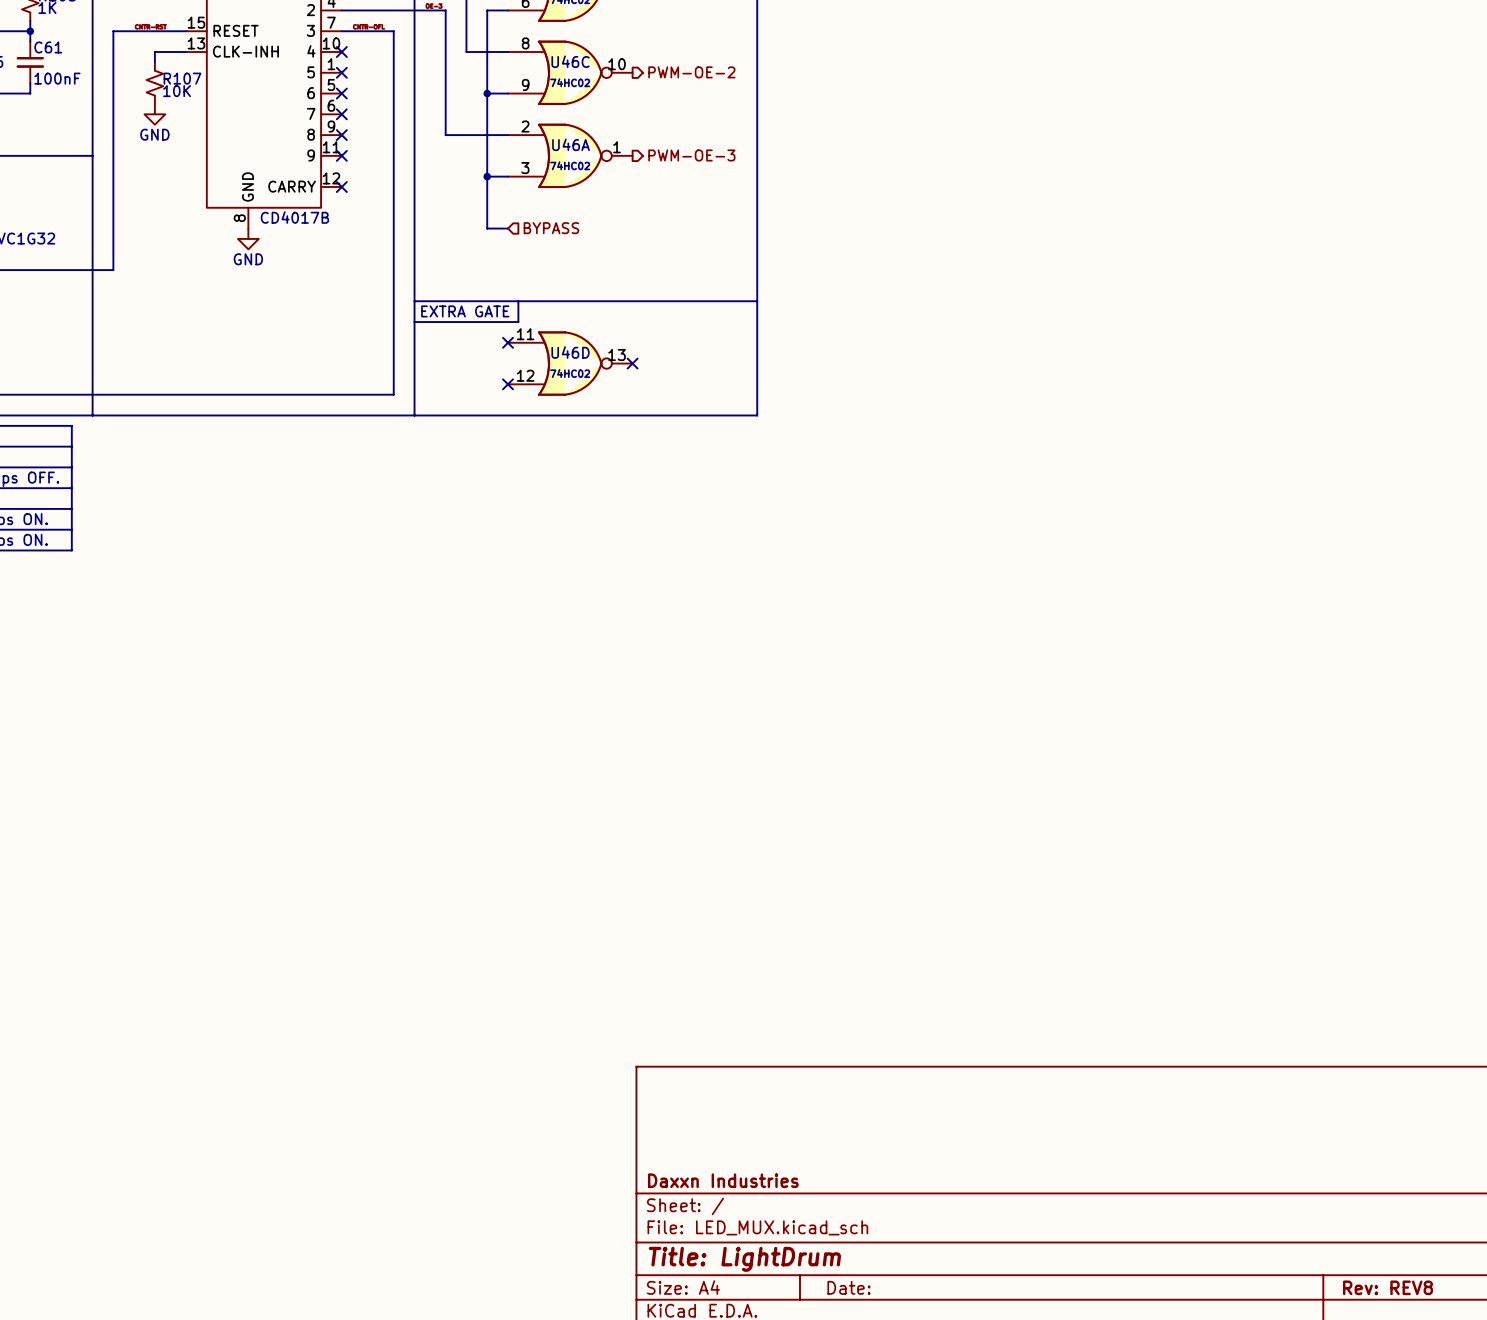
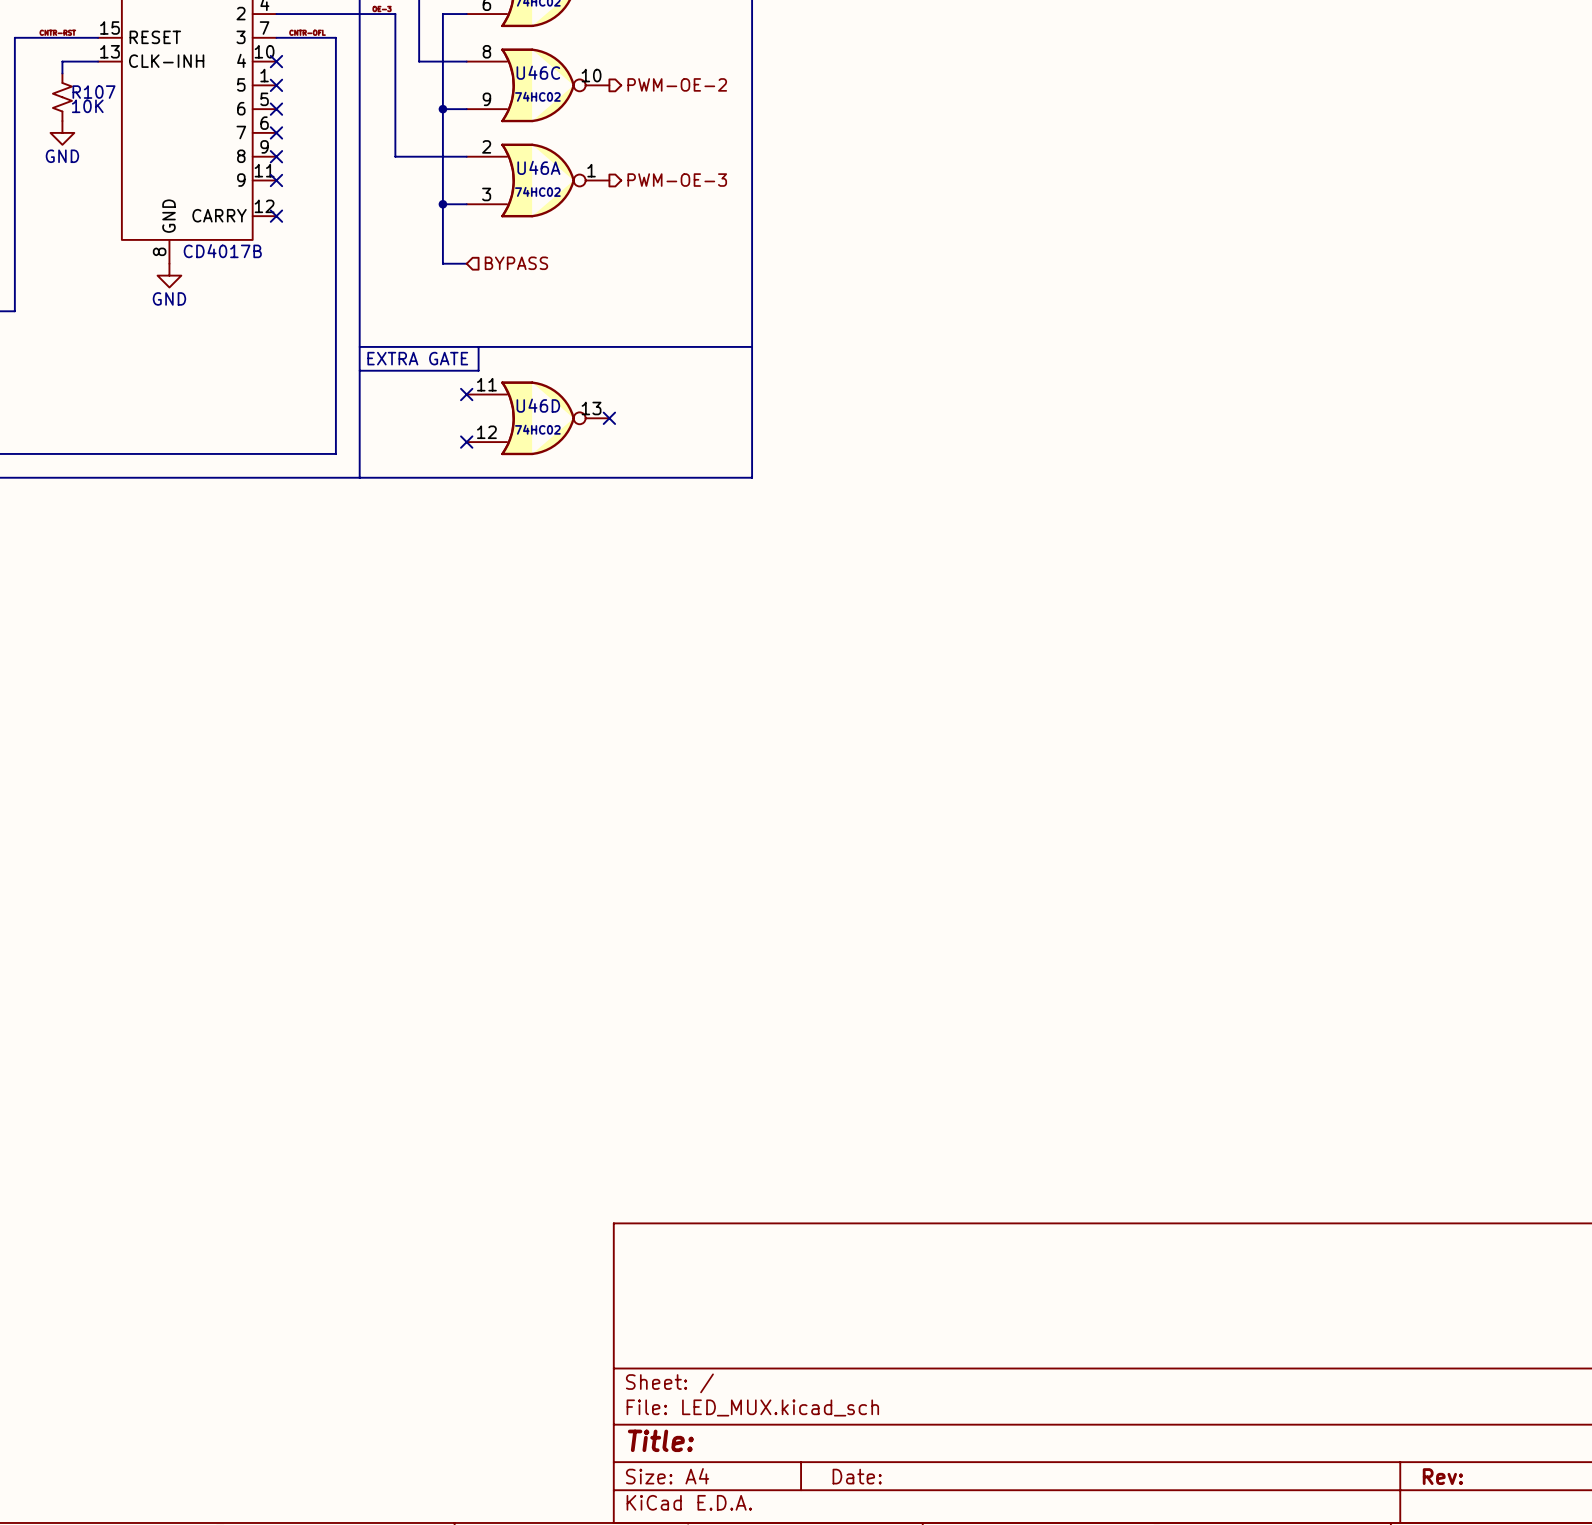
title block: Daxxn Industries (723, 1180) -> none
title block: Title: LightDrum (744, 1259) -> Title: (660, 1440)
title block: Rev: REV8 (1388, 1287) -> Rev: (1442, 1476)

